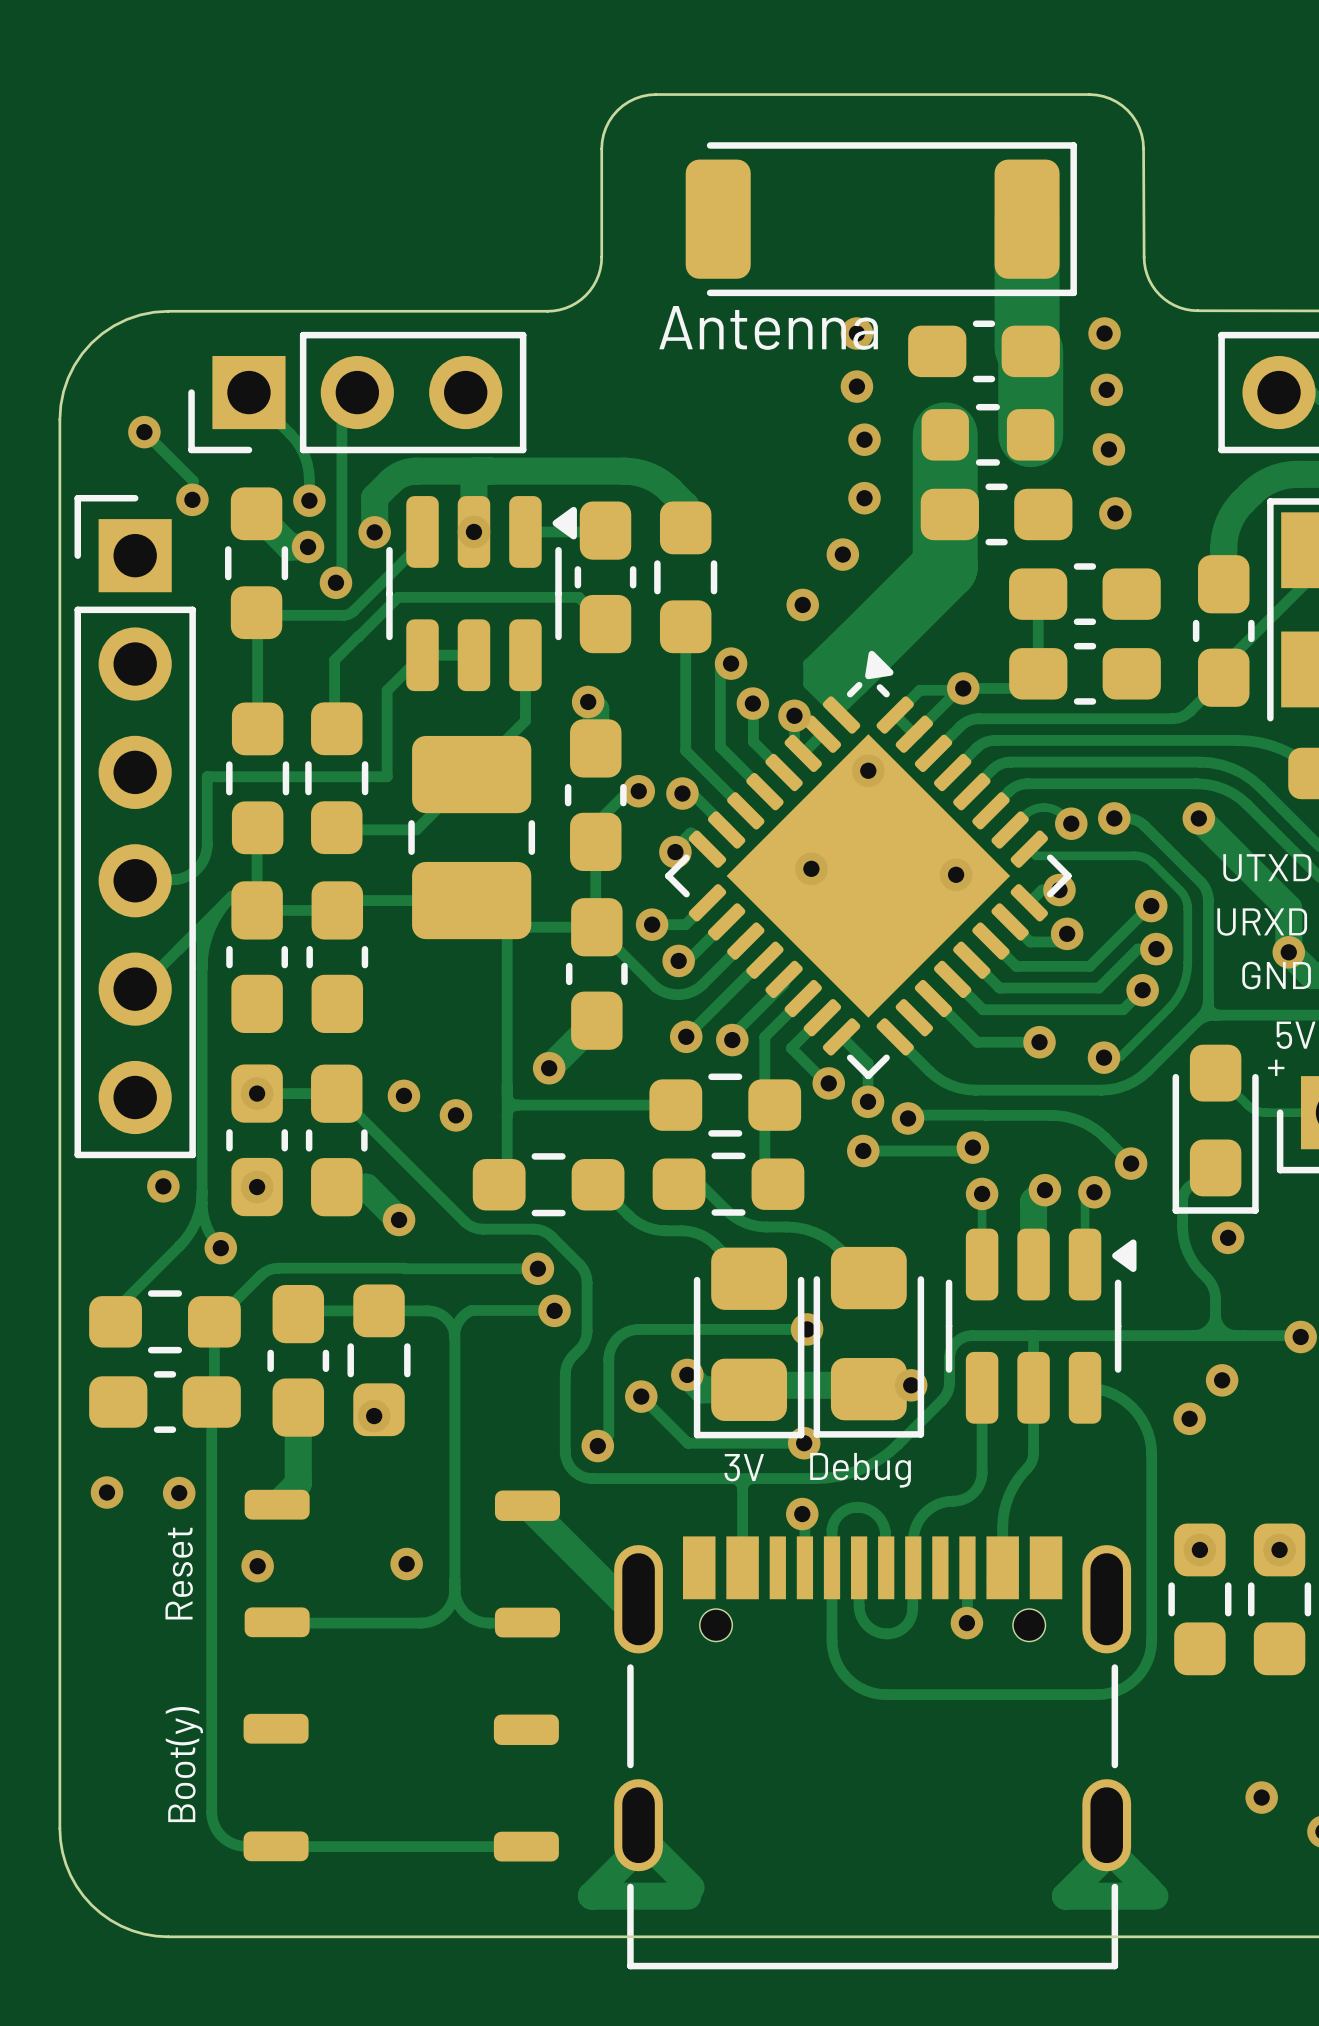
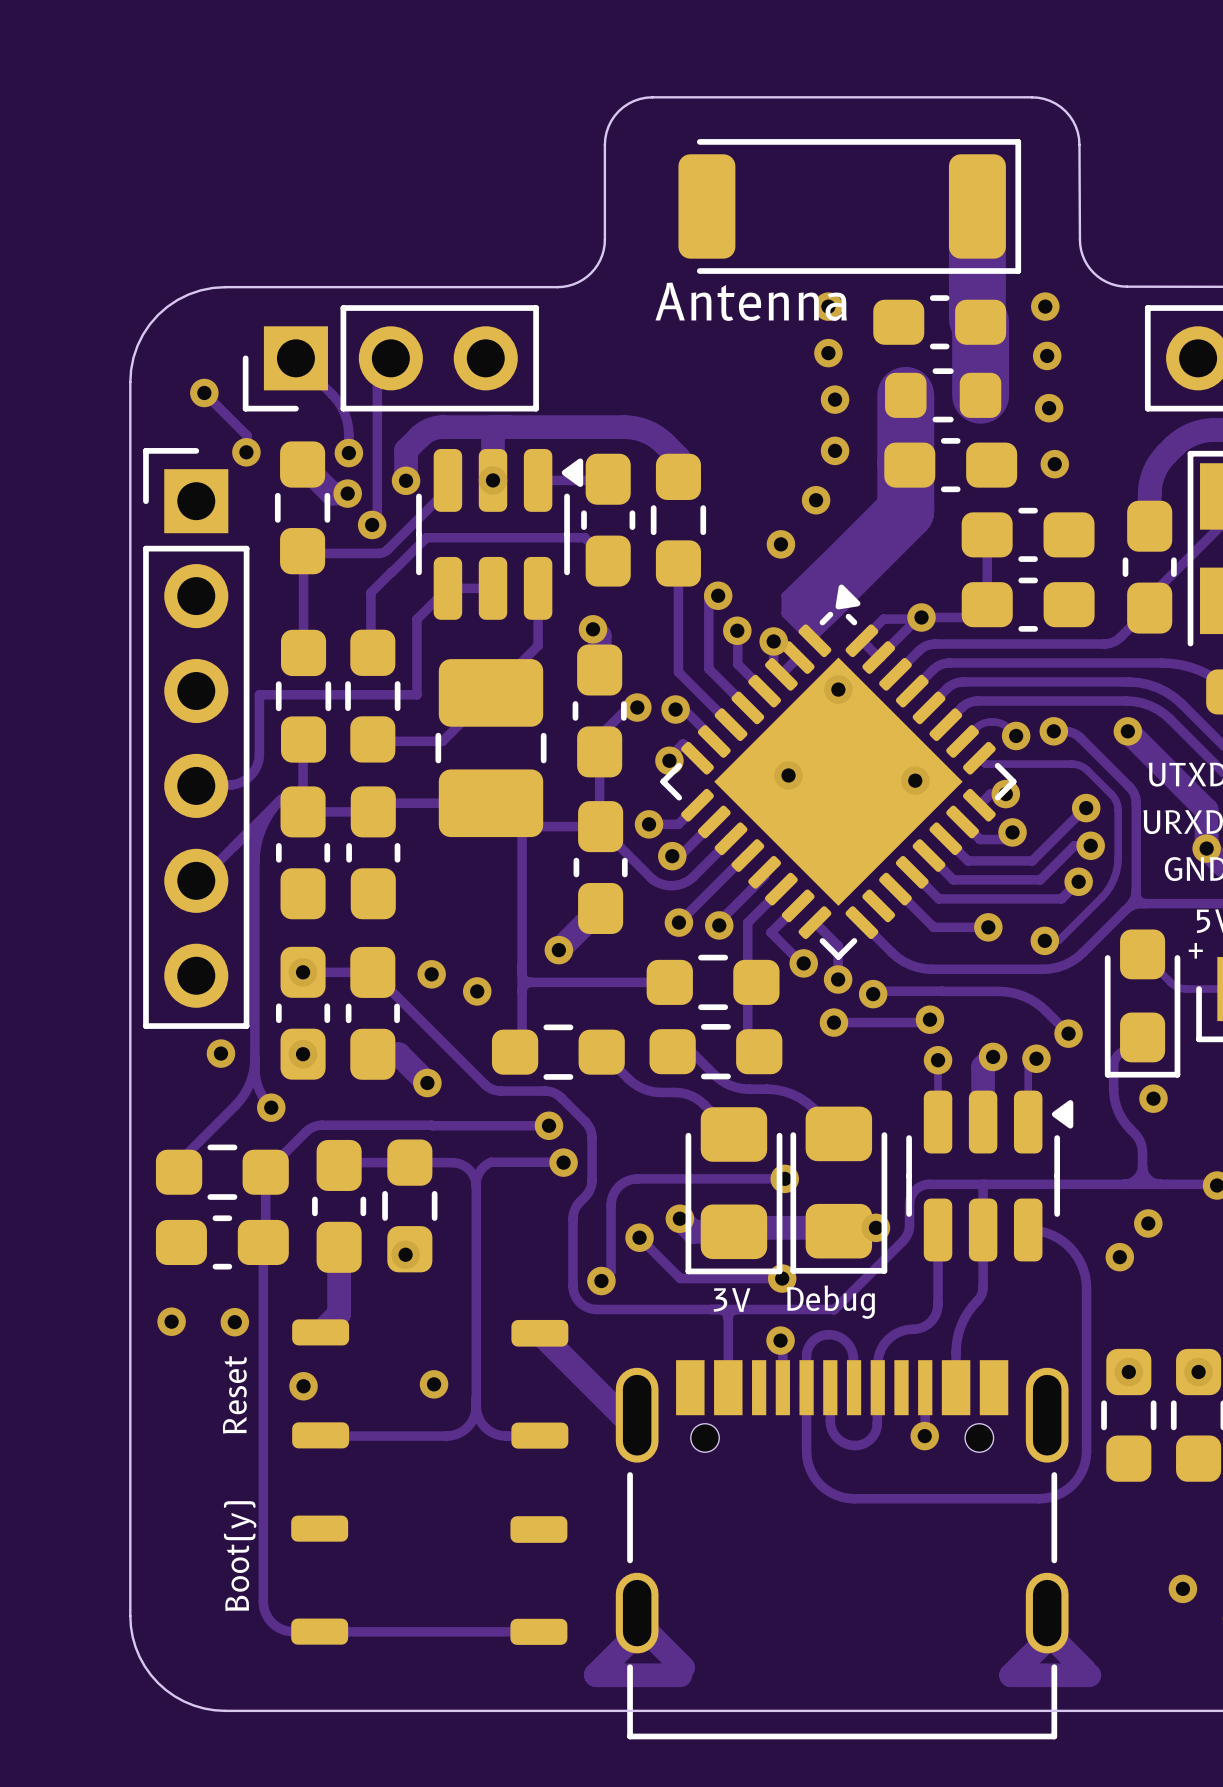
track: (898, 1444) (880, 1458) (860, 1469) (838, 1476) (815, 1478) -> (864, 1279) (834, 1309)
track: none -> (792, 1309) (833, 1309)

